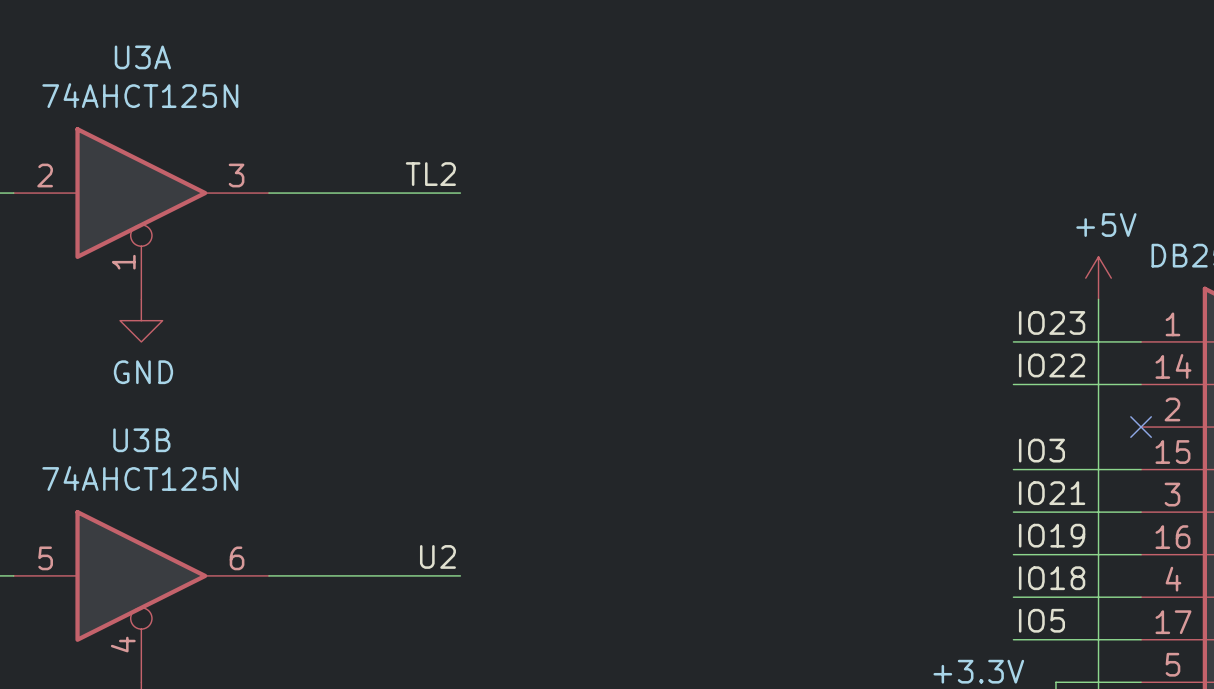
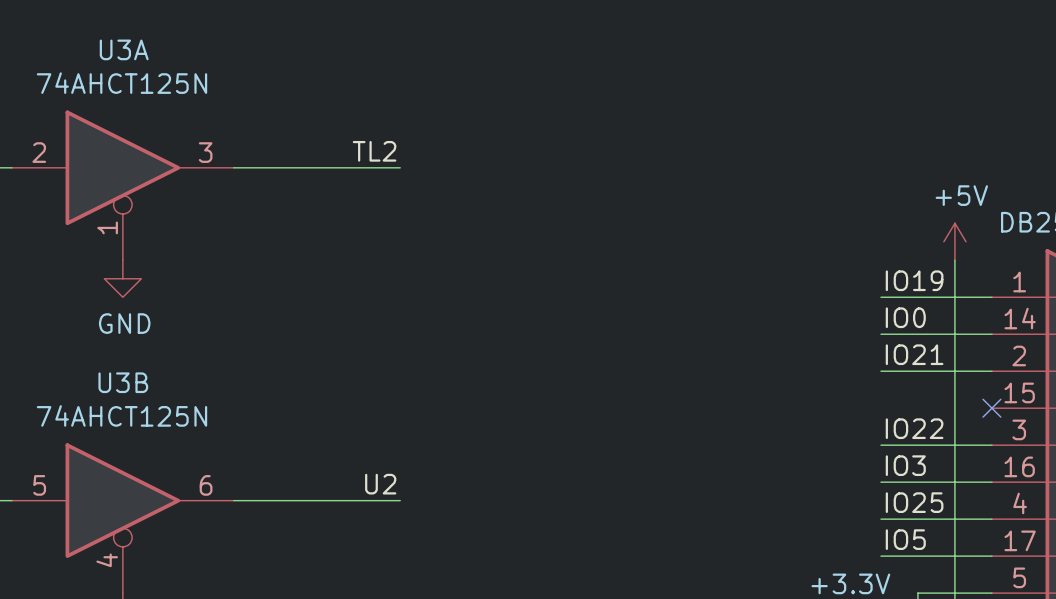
label: IO23 (1052, 322) -> IO19 (914, 280)
label: IO22 (1052, 365) -> IO0 (905, 317)
label: none -> IO21 (914, 354)
no-connect mark position: (1141, 427) -> (991, 408)
label: IO3 (1041, 450) -> none
wire: (1013, 469) (1141, 469) -> (880, 371) (991, 371)
label: IO21 (1052, 493) -> IO22 (914, 428)
label: IO19 (1052, 535) -> IO3 (905, 465)
label: IO18 (1052, 578) -> IO25 (914, 502)

